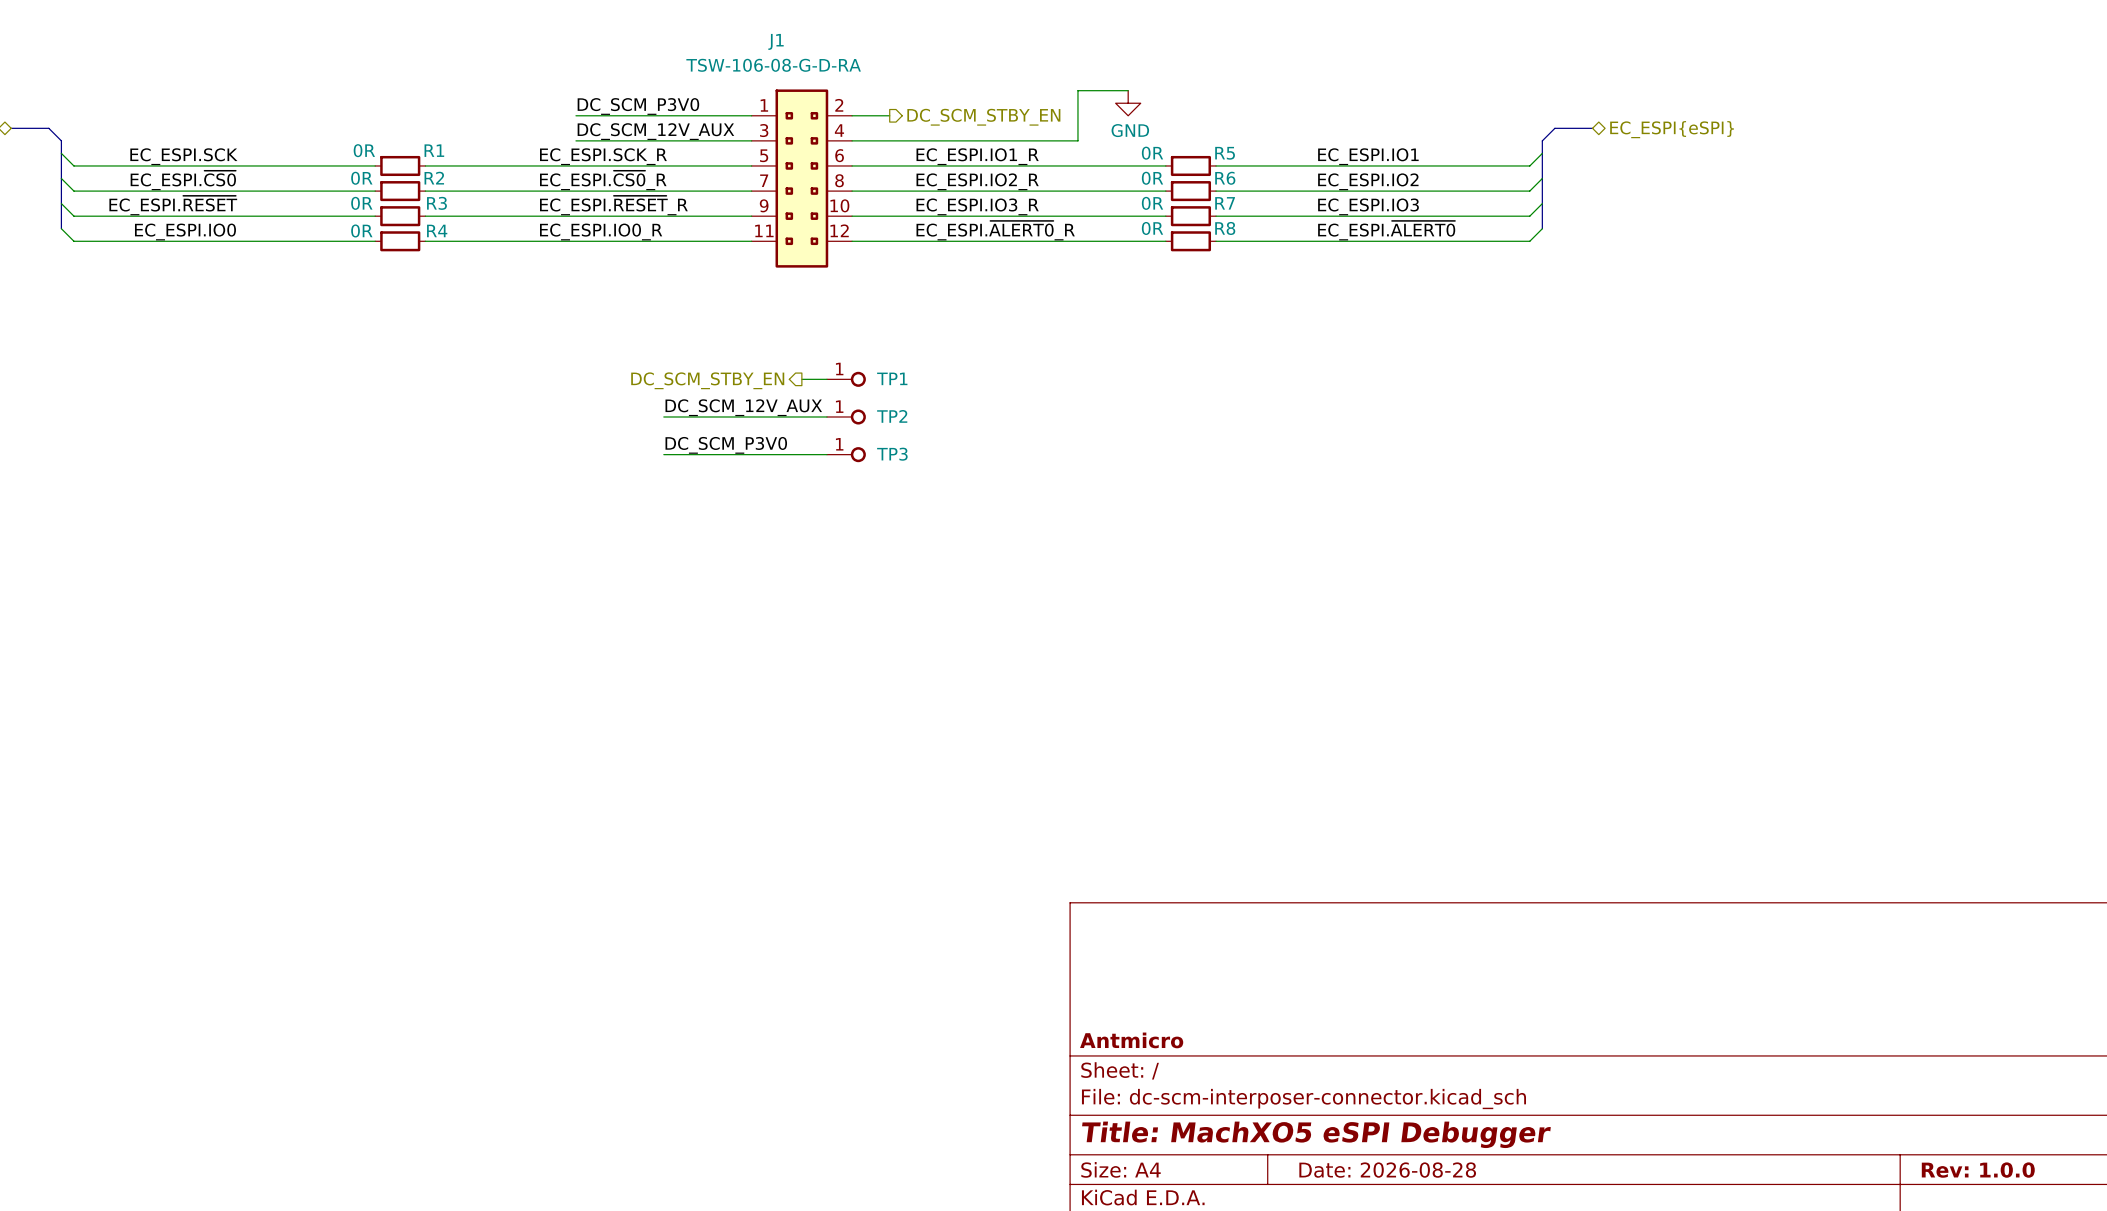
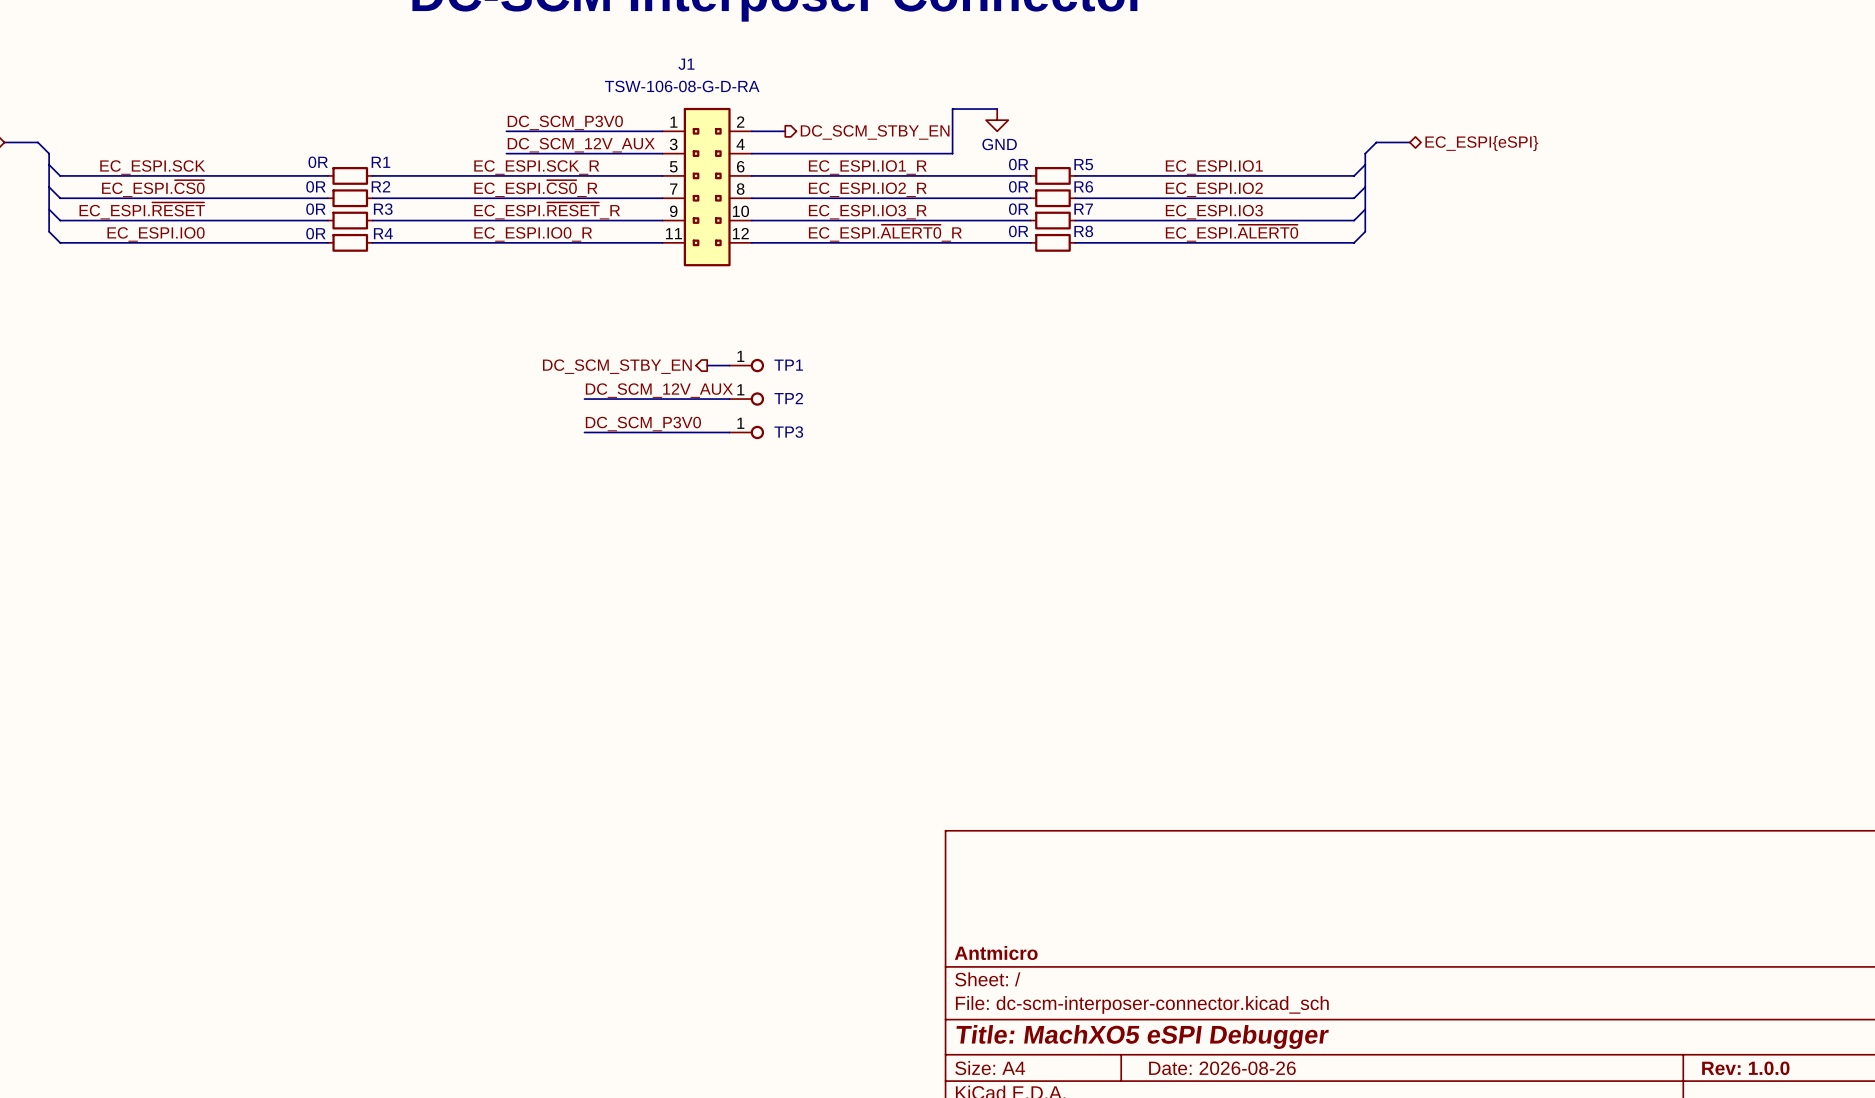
title block: Date: 2026-08-28 (1387, 1170) -> Date: 2026-08-26 (1222, 1068)

